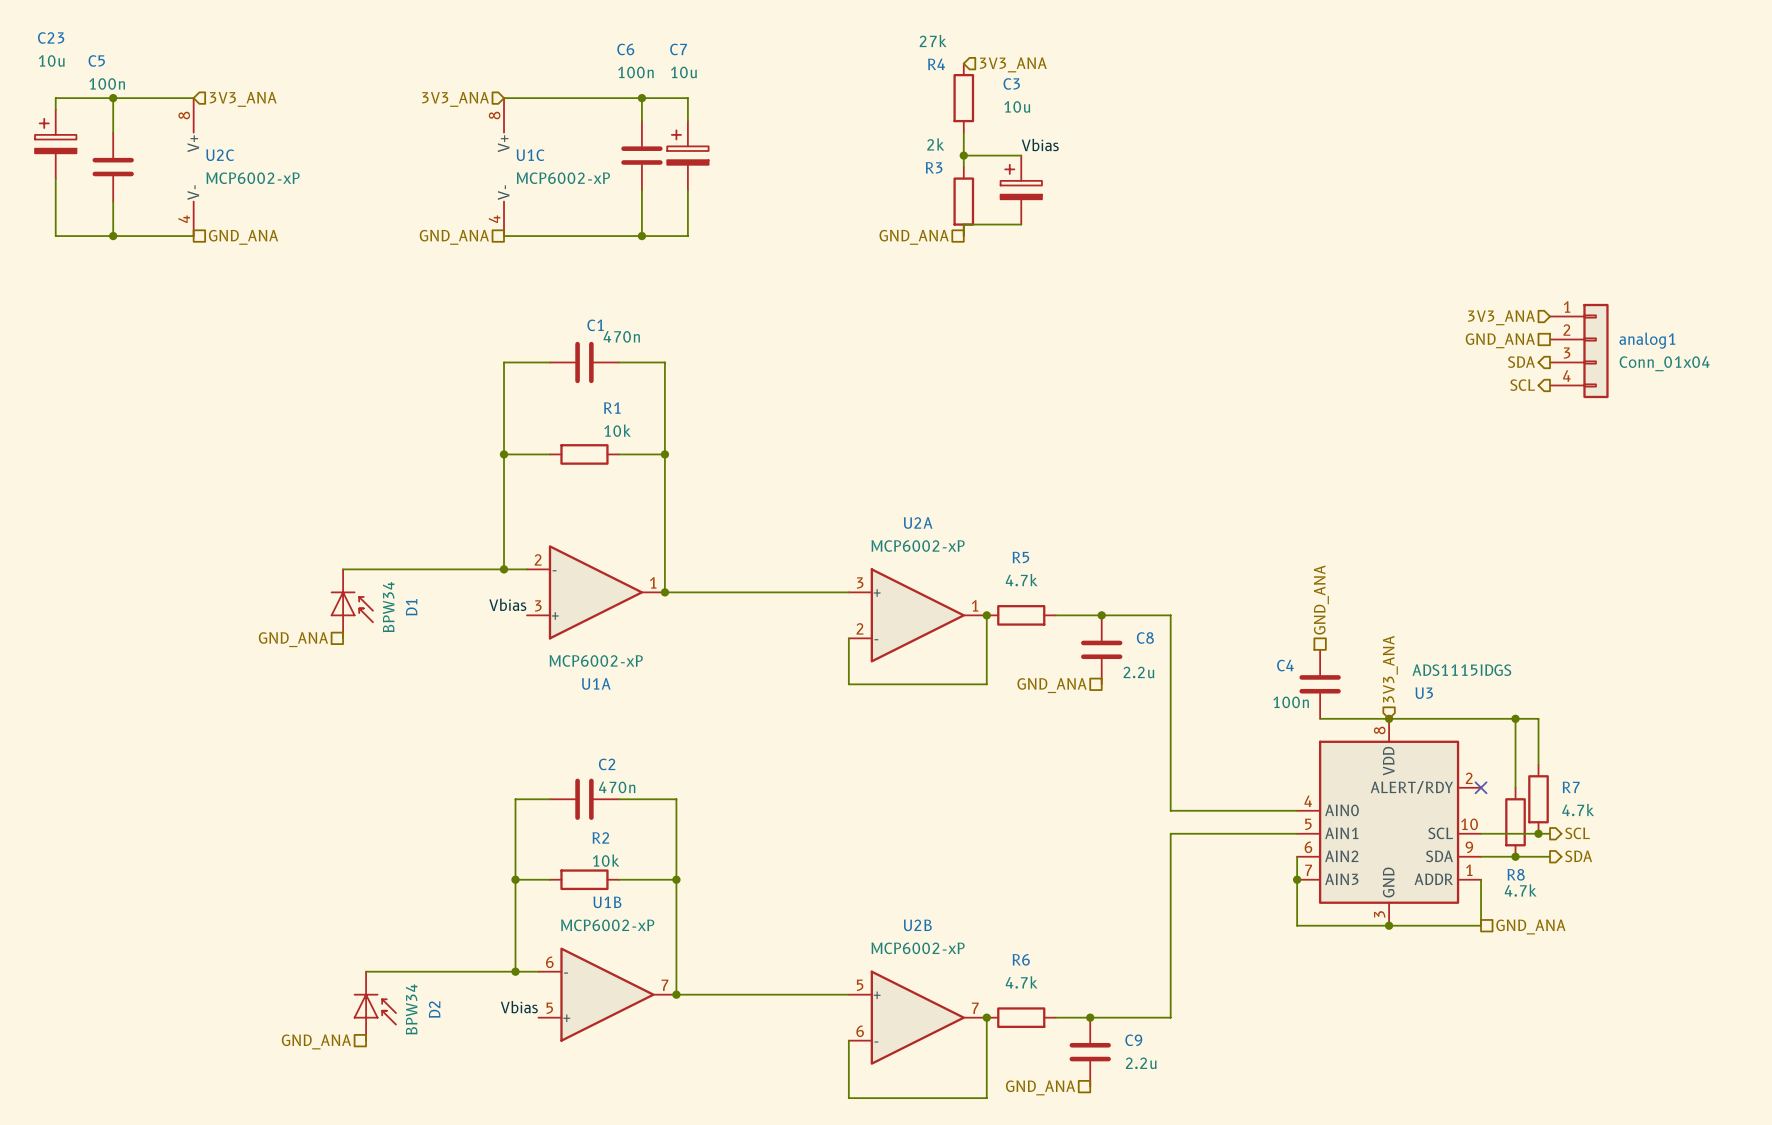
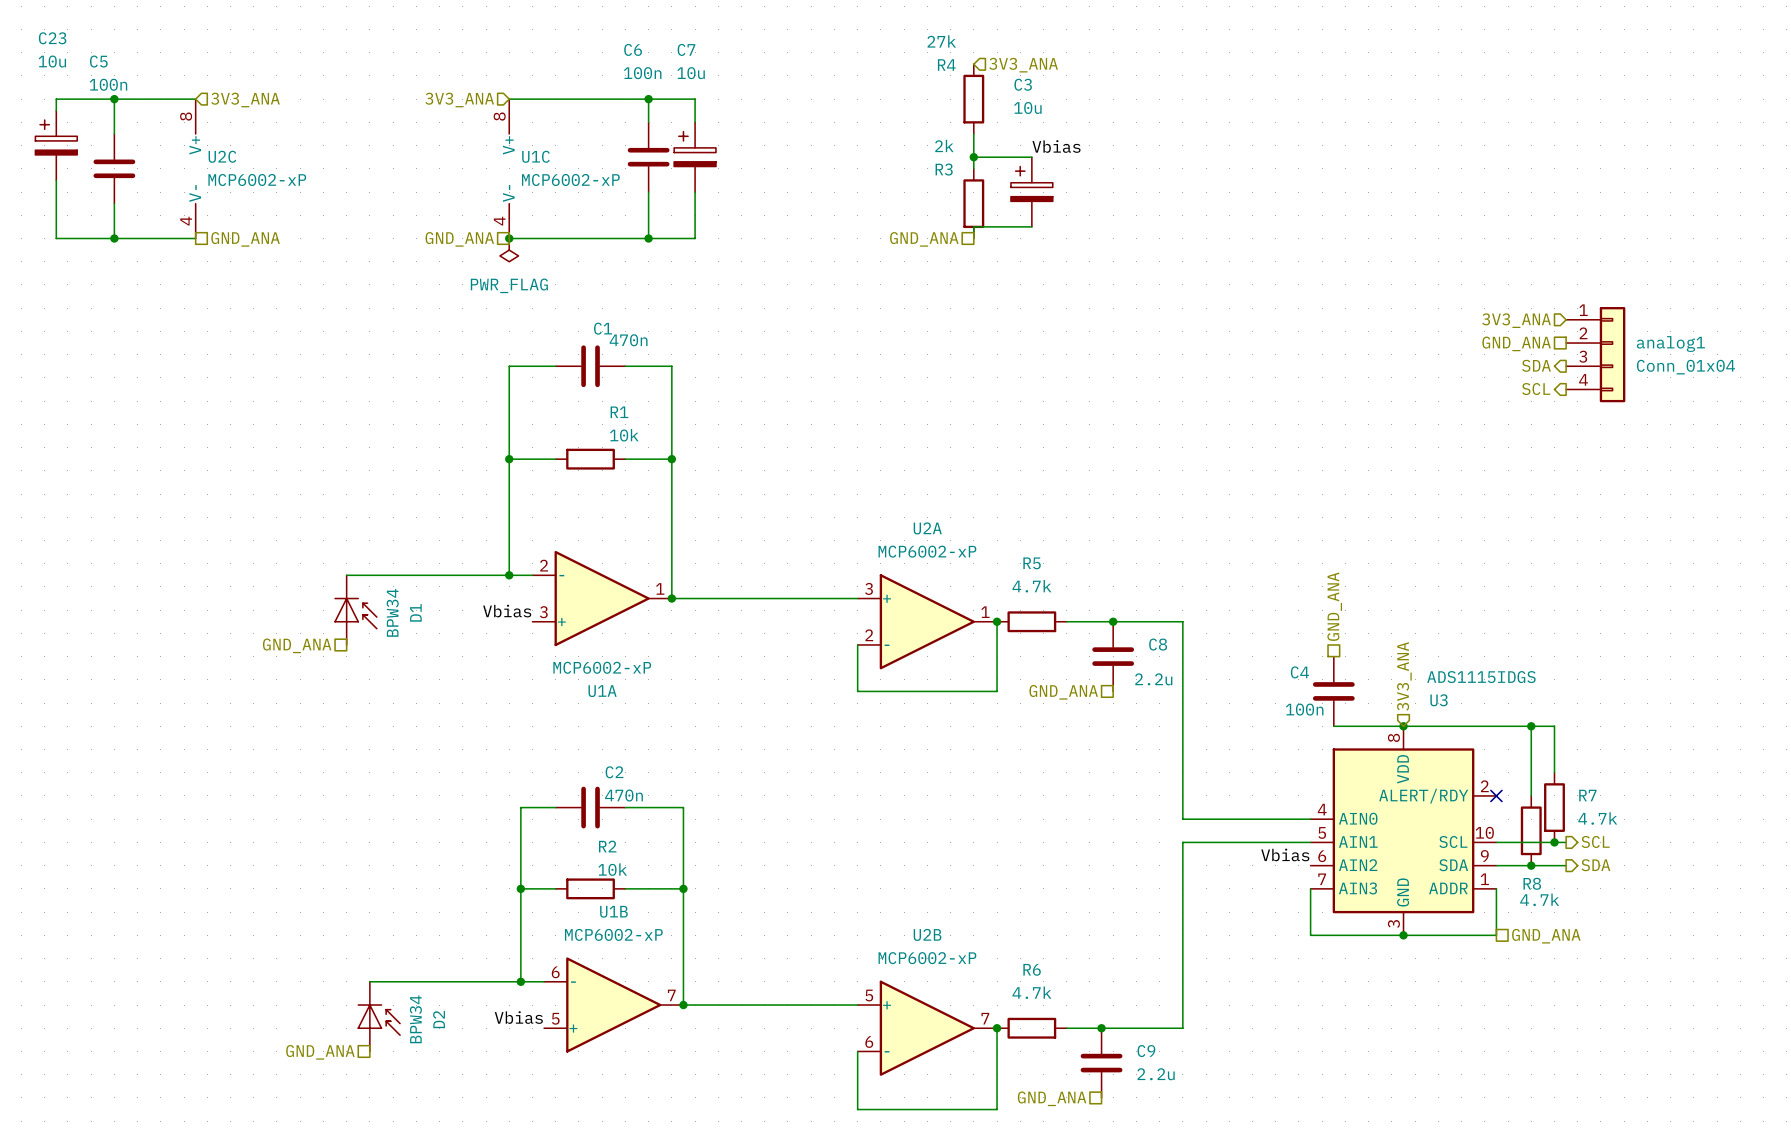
junction: none -> (509, 238)
power symbol: none -> PWR_FLAG (509, 250)
label: none -> Vbias (1285, 854)
wire: (1297, 856) (1297, 879) -> none
junction: (1297, 879) -> none

